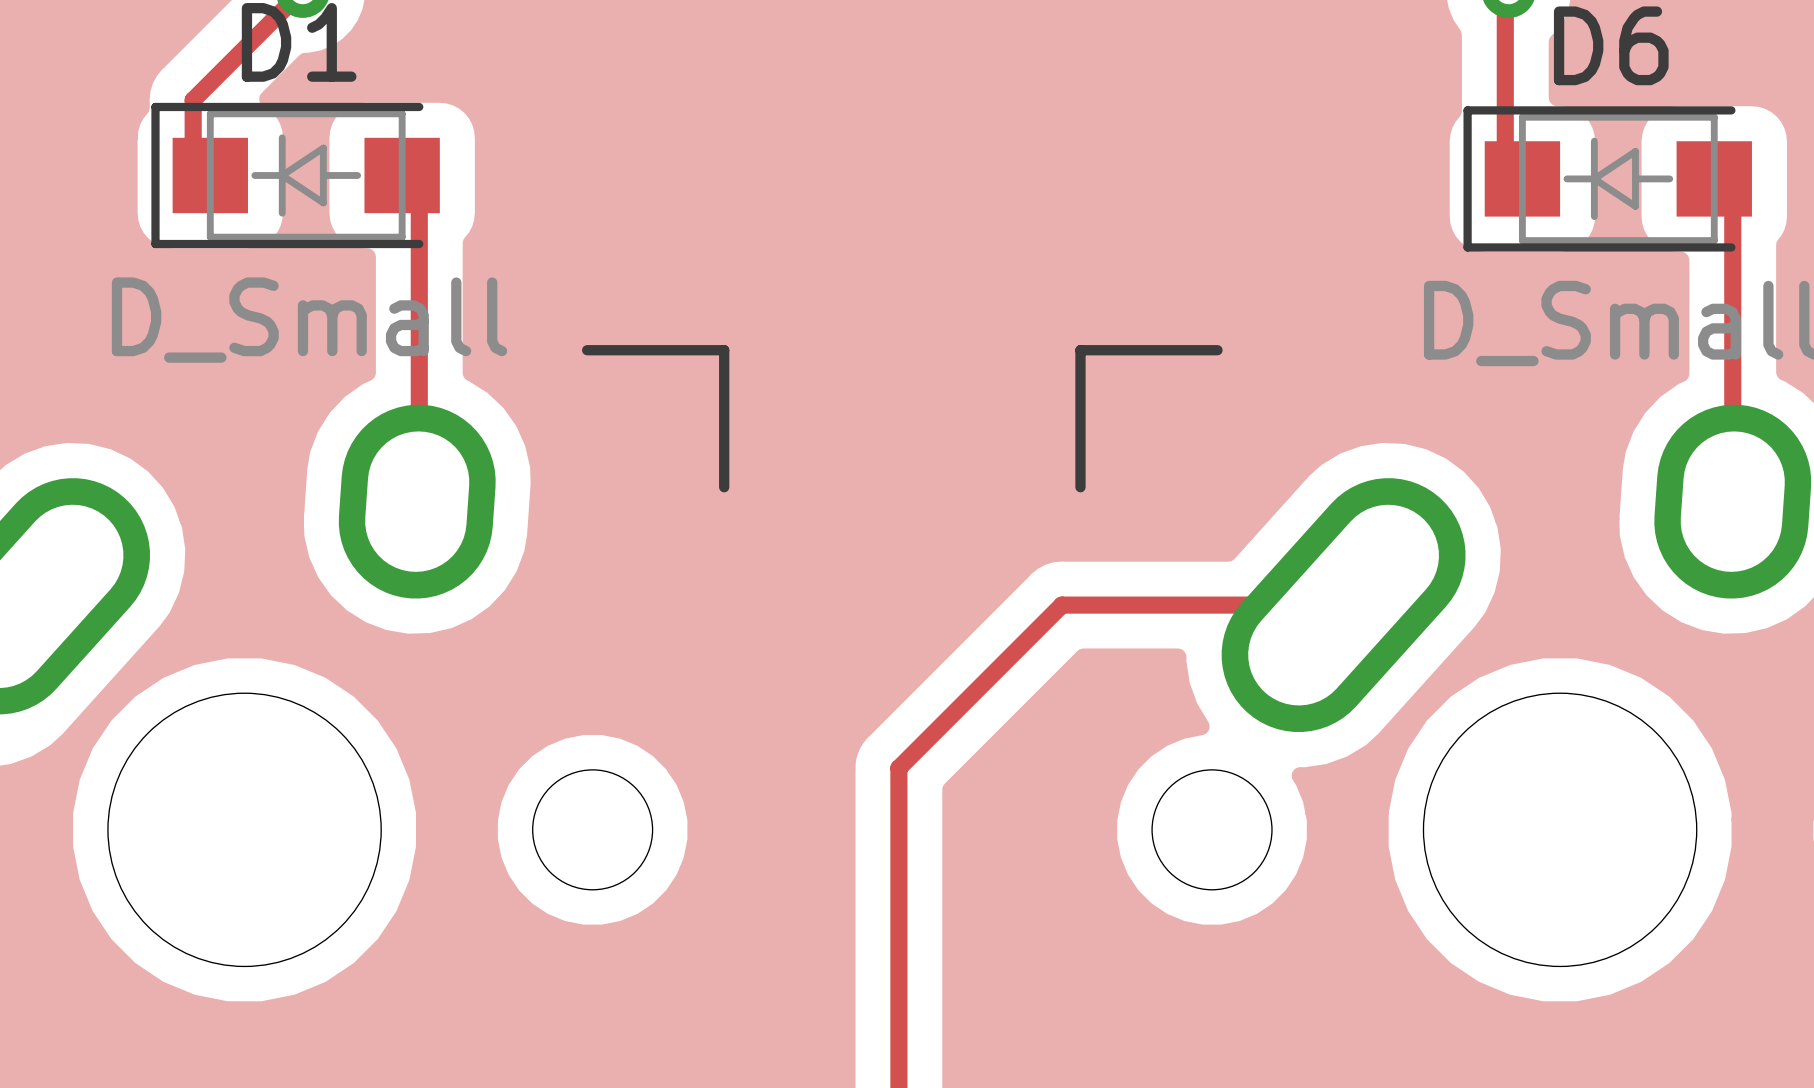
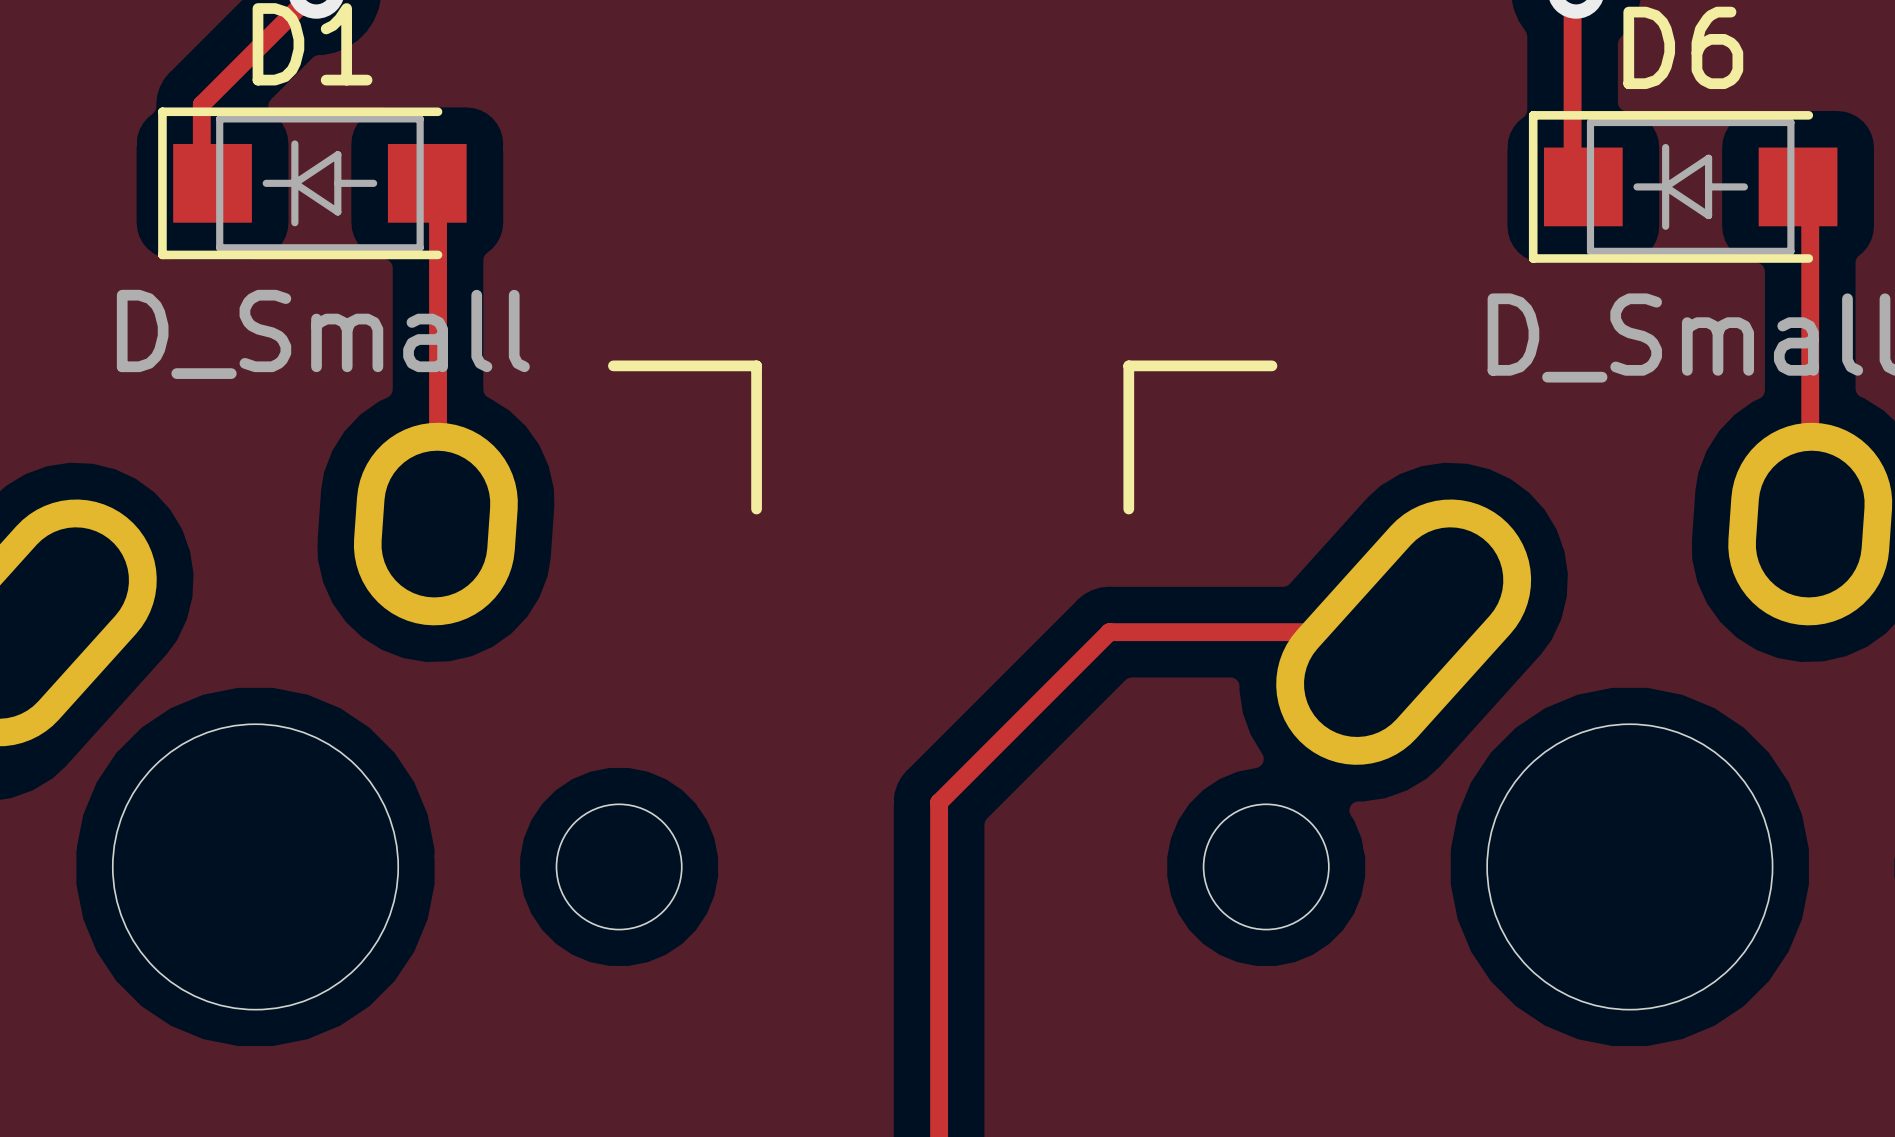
D1 footprint: [151, 102, 440, 249] -> [158, 107, 467, 260]
D6 footprint: [1463, 106, 1752, 252] -> [1528, 111, 1838, 263]

